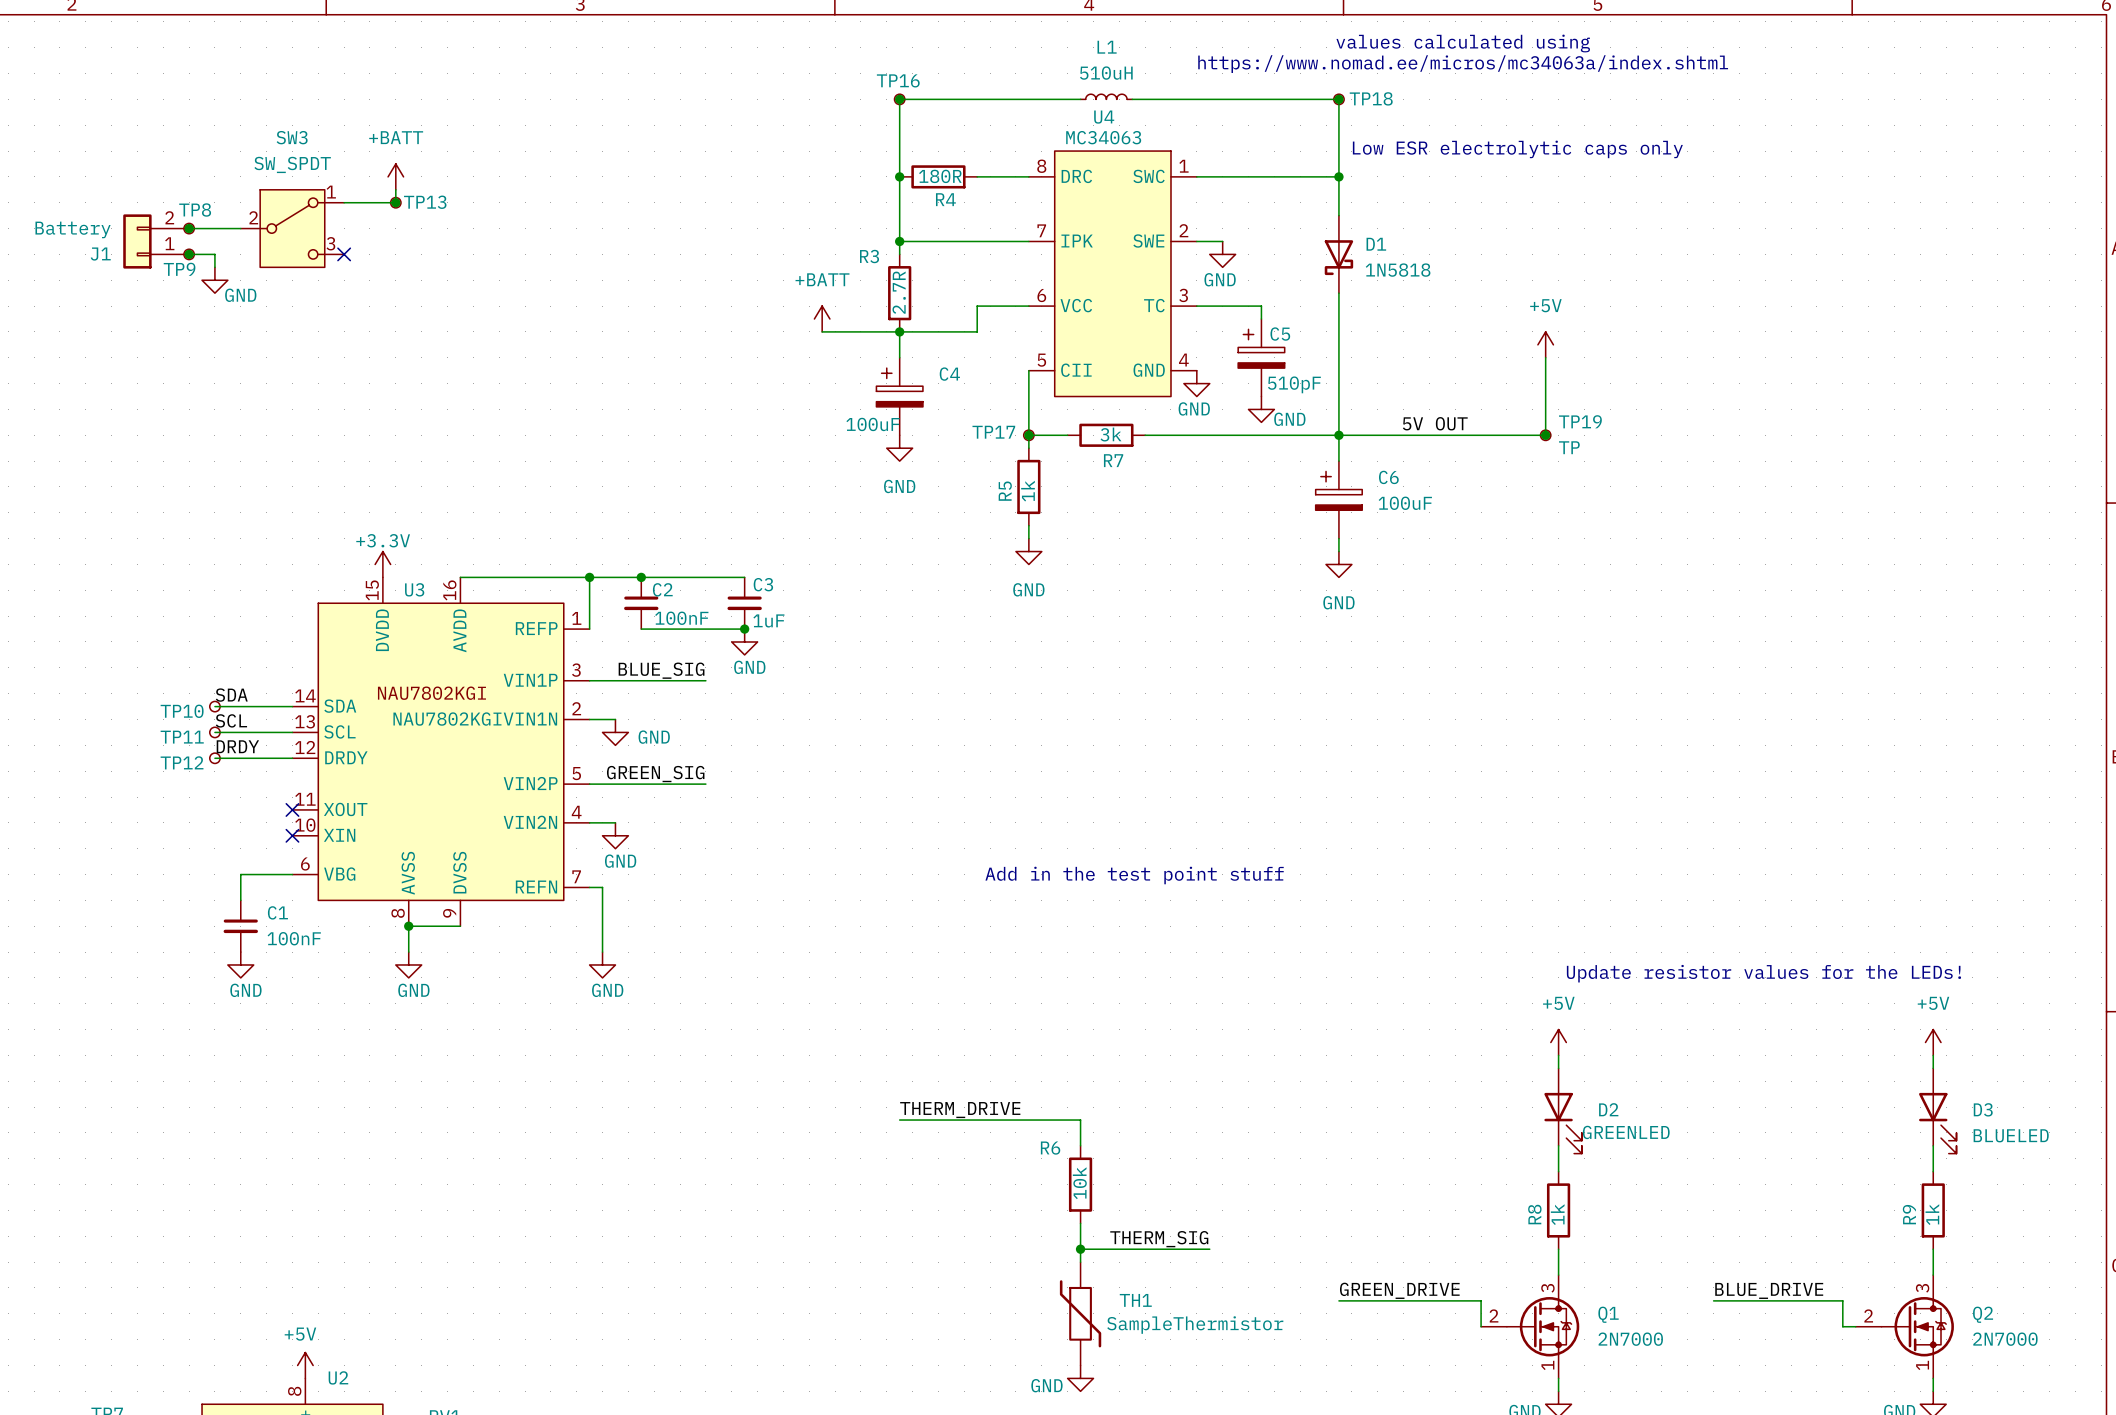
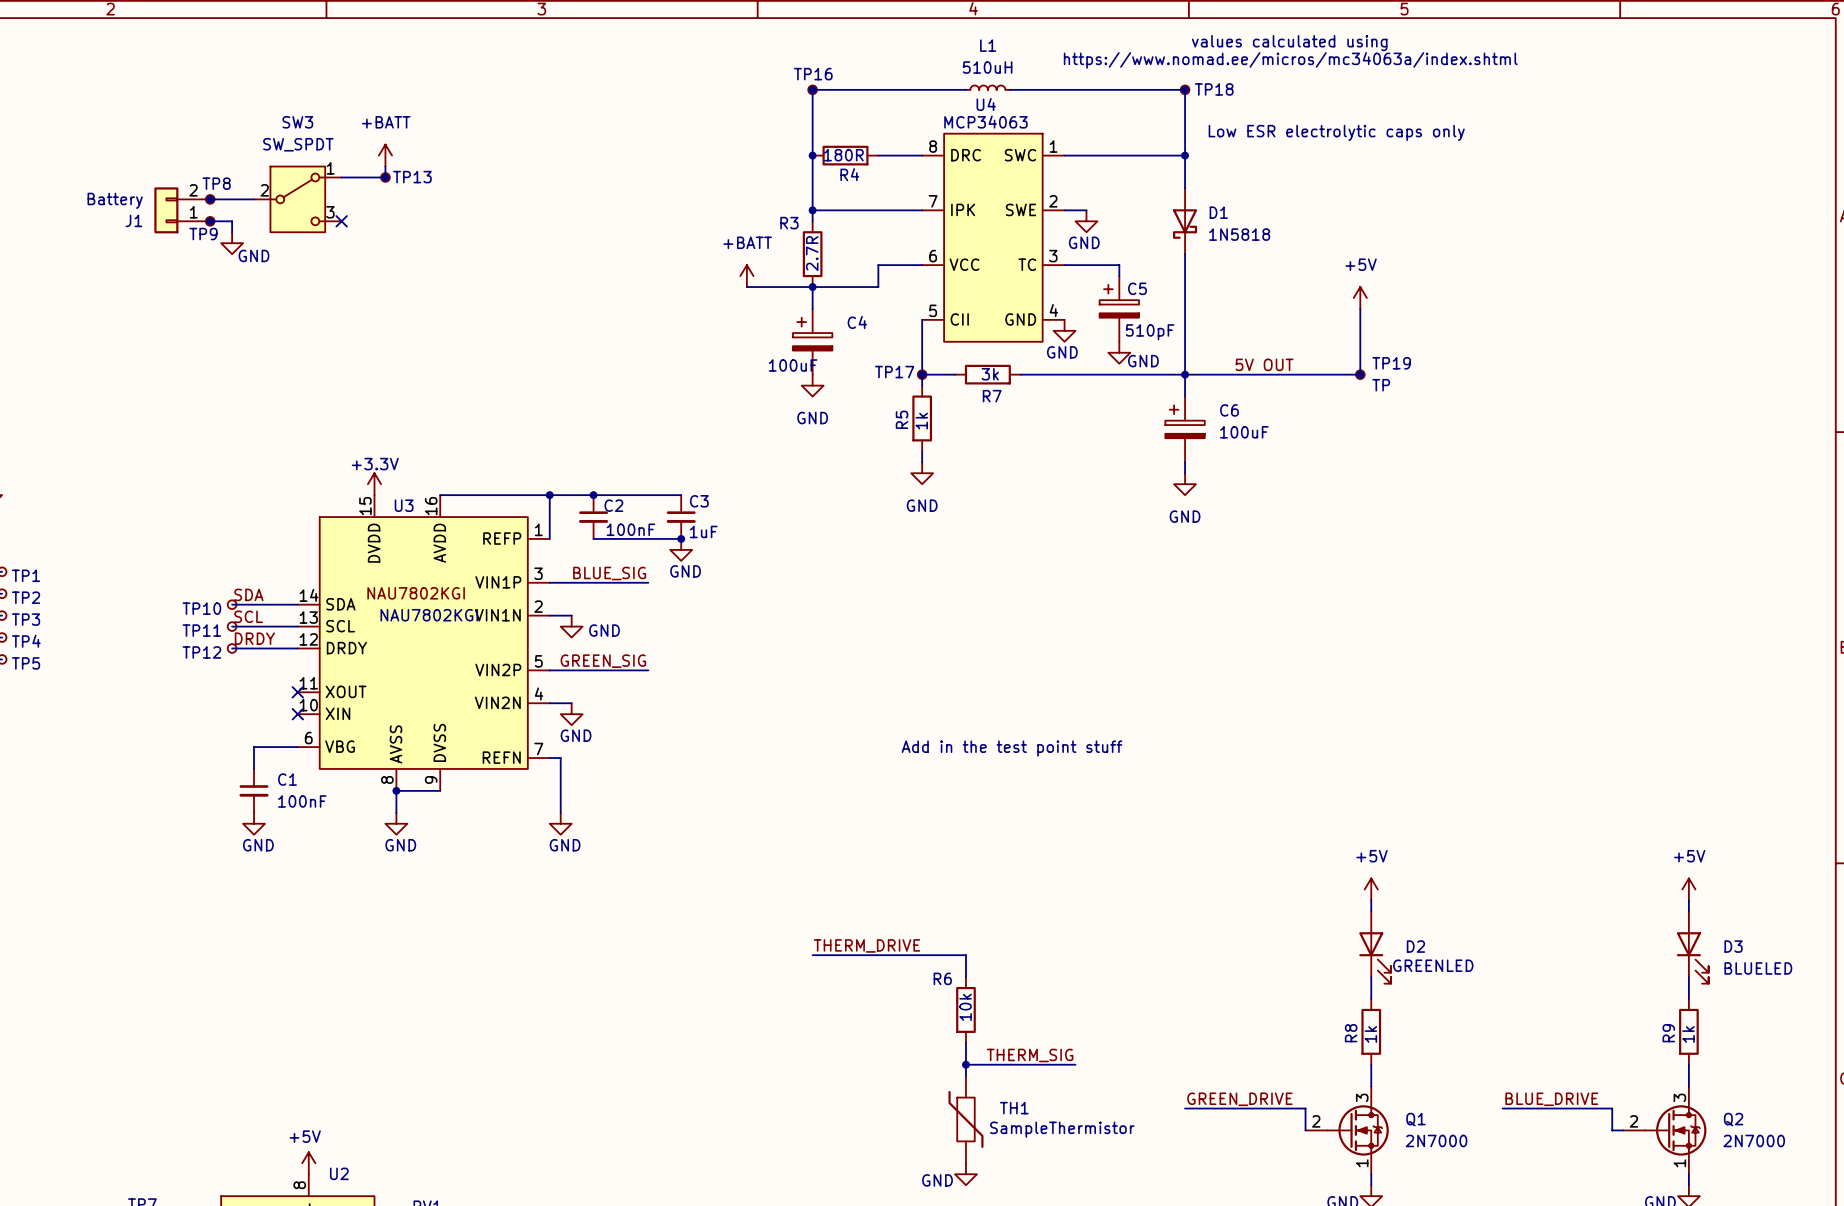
U4 value: MC34063 (1103, 137) -> MCP34063 (985, 122)
text: Update resistor values for the LEDs! (1763, 973) -> none

